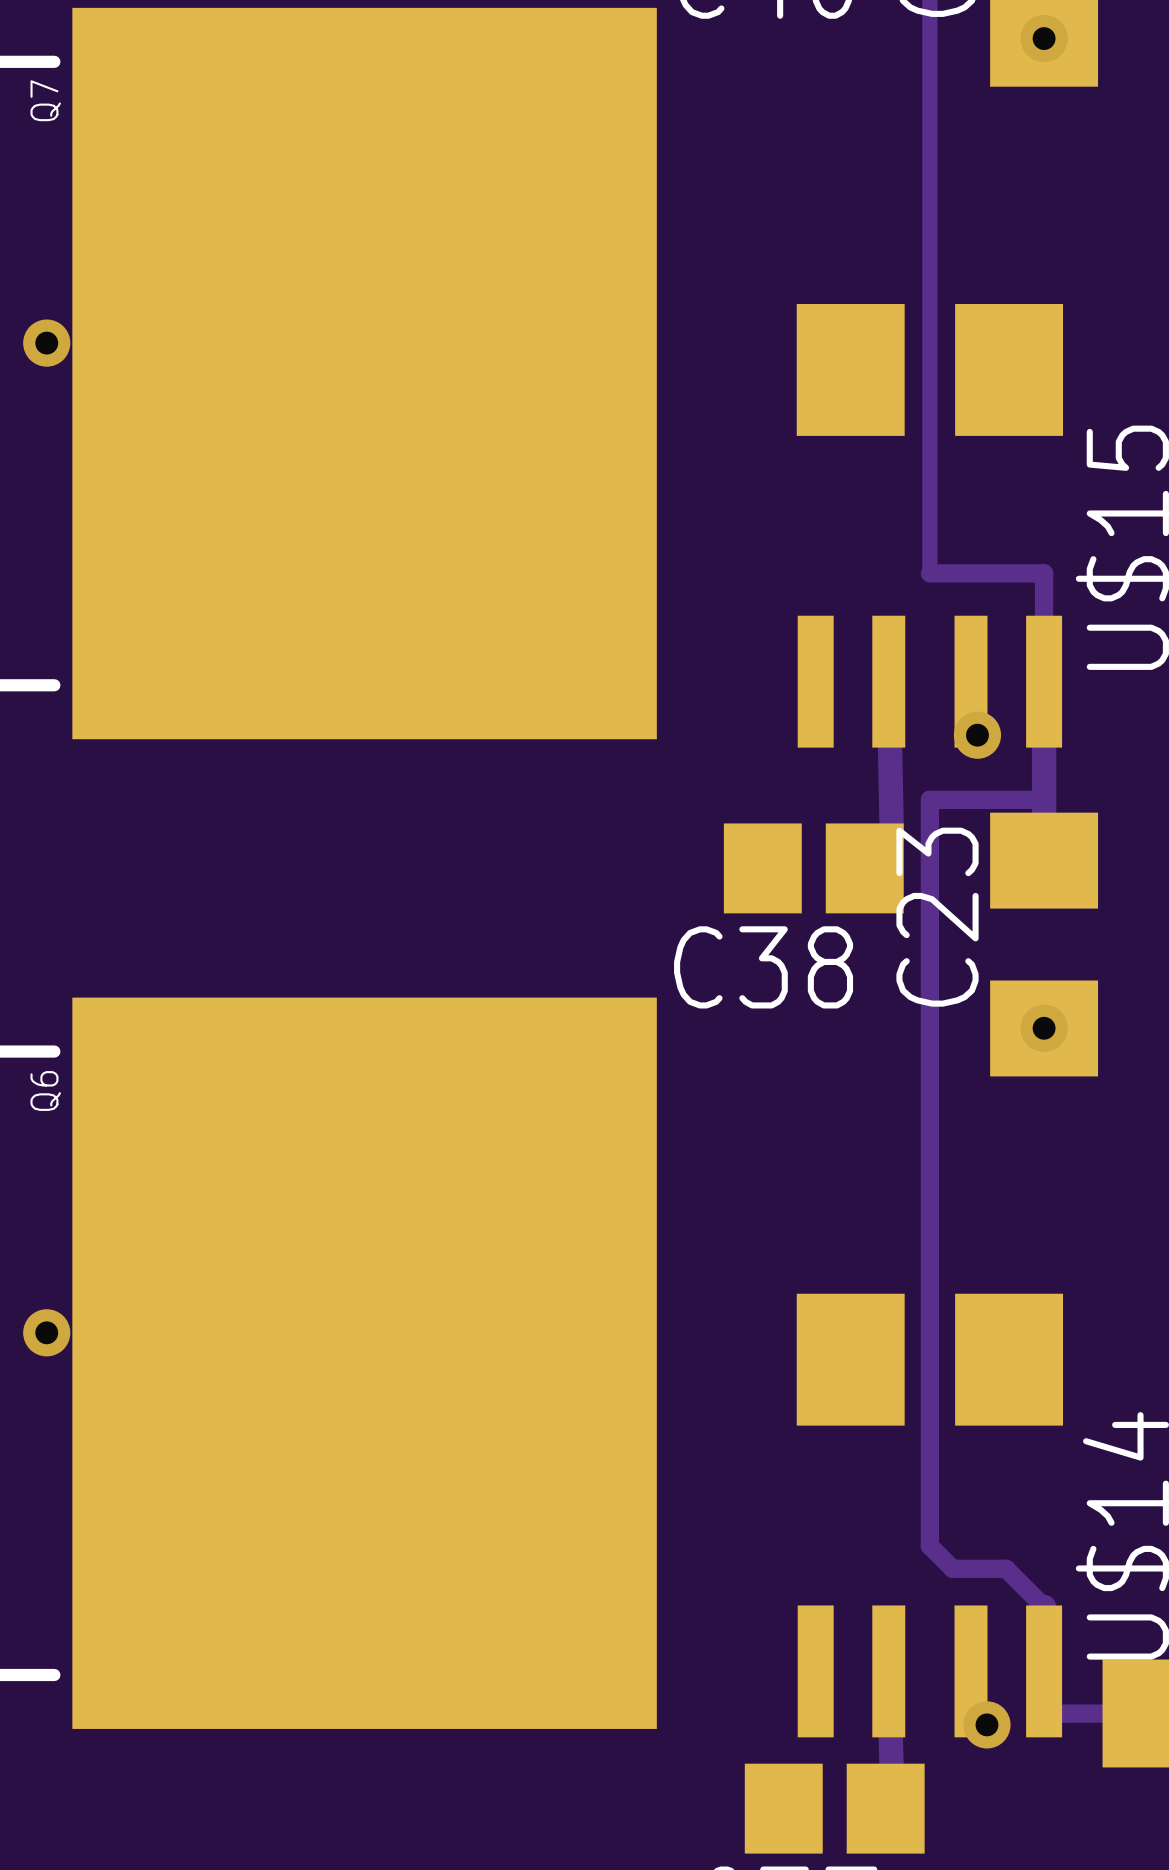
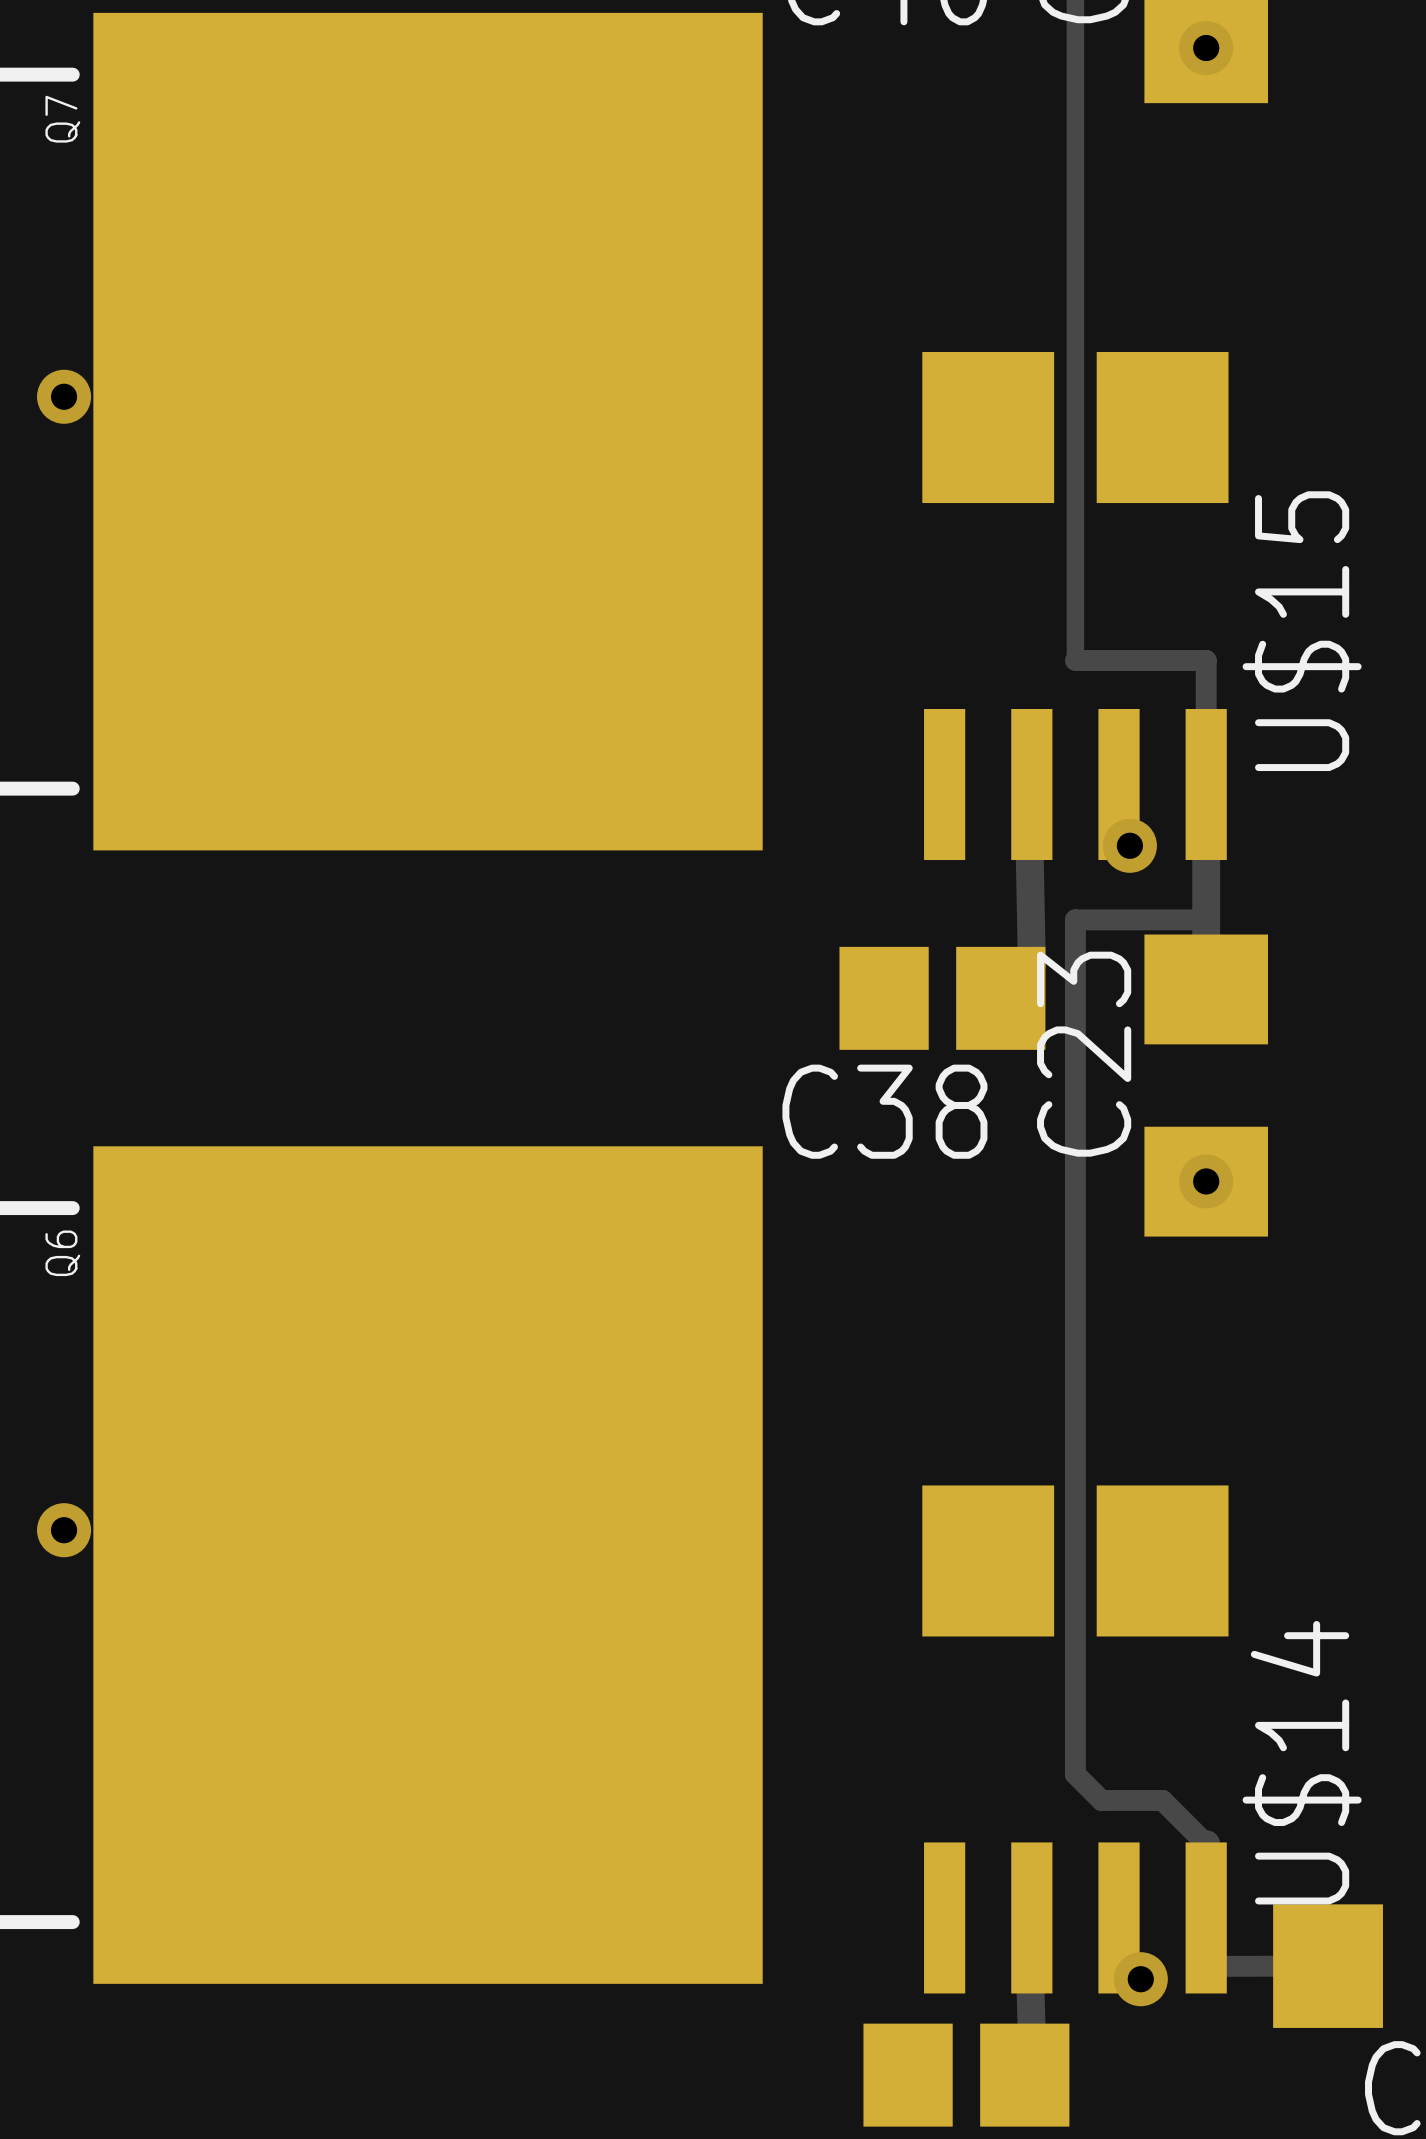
U$15 footprint: [796, 304, 1064, 748] -> [922, 352, 1229, 861]
U$14 footprint: [796, 1293, 1064, 1738] -> [922, 1485, 1229, 1994]

